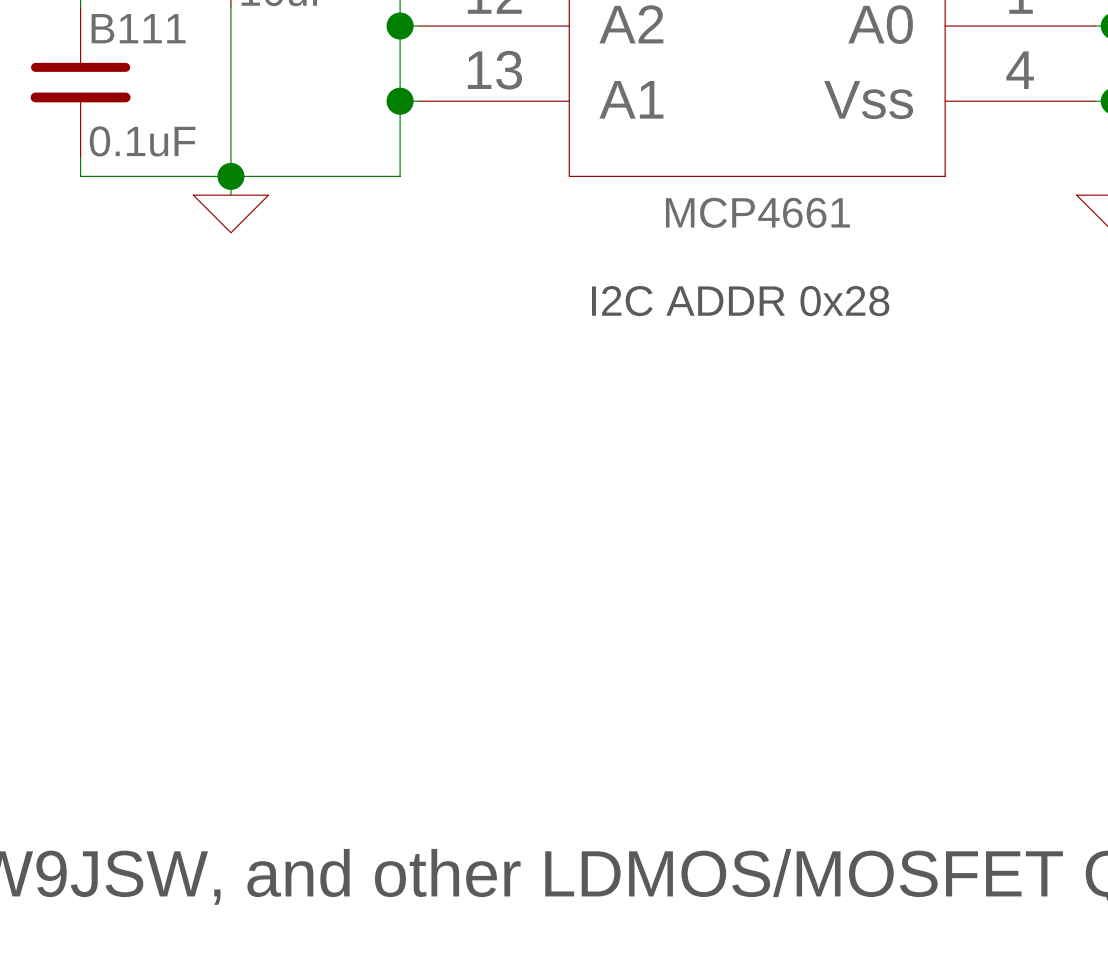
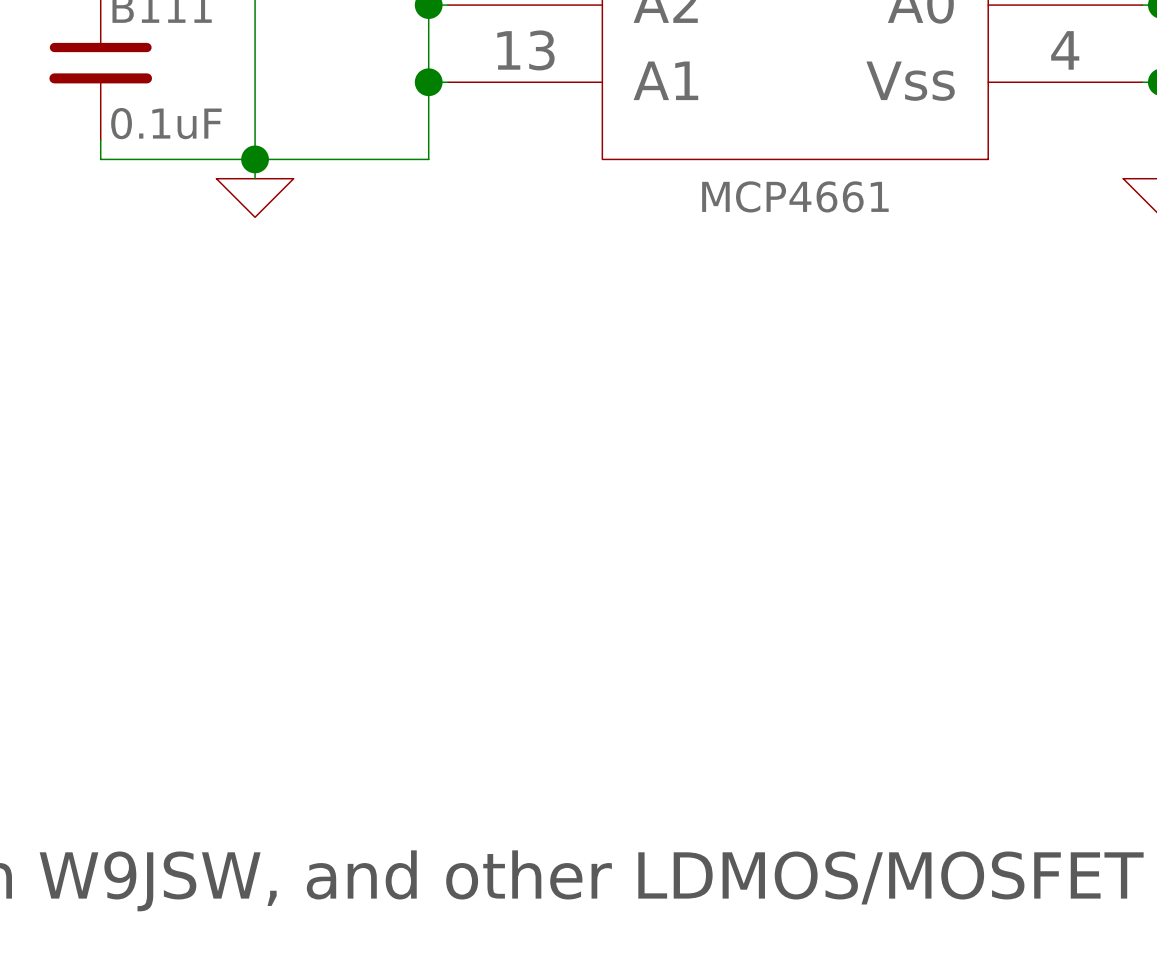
text: I2C ADDR 0x28 (740, 301) -> none

